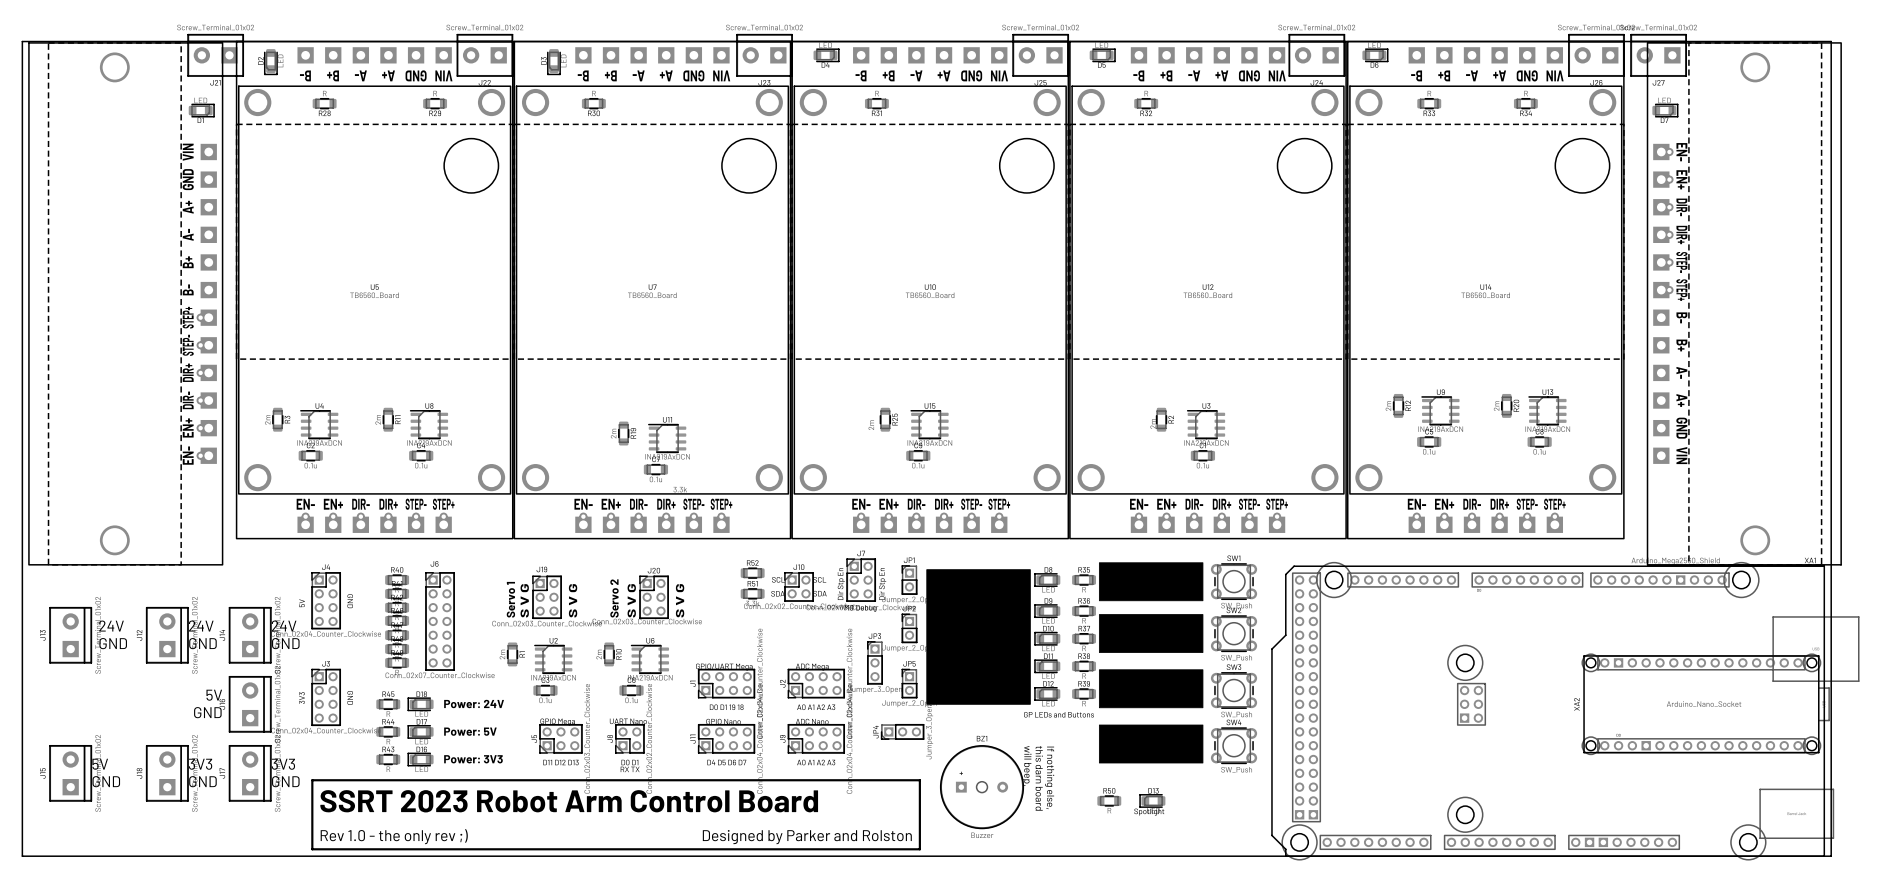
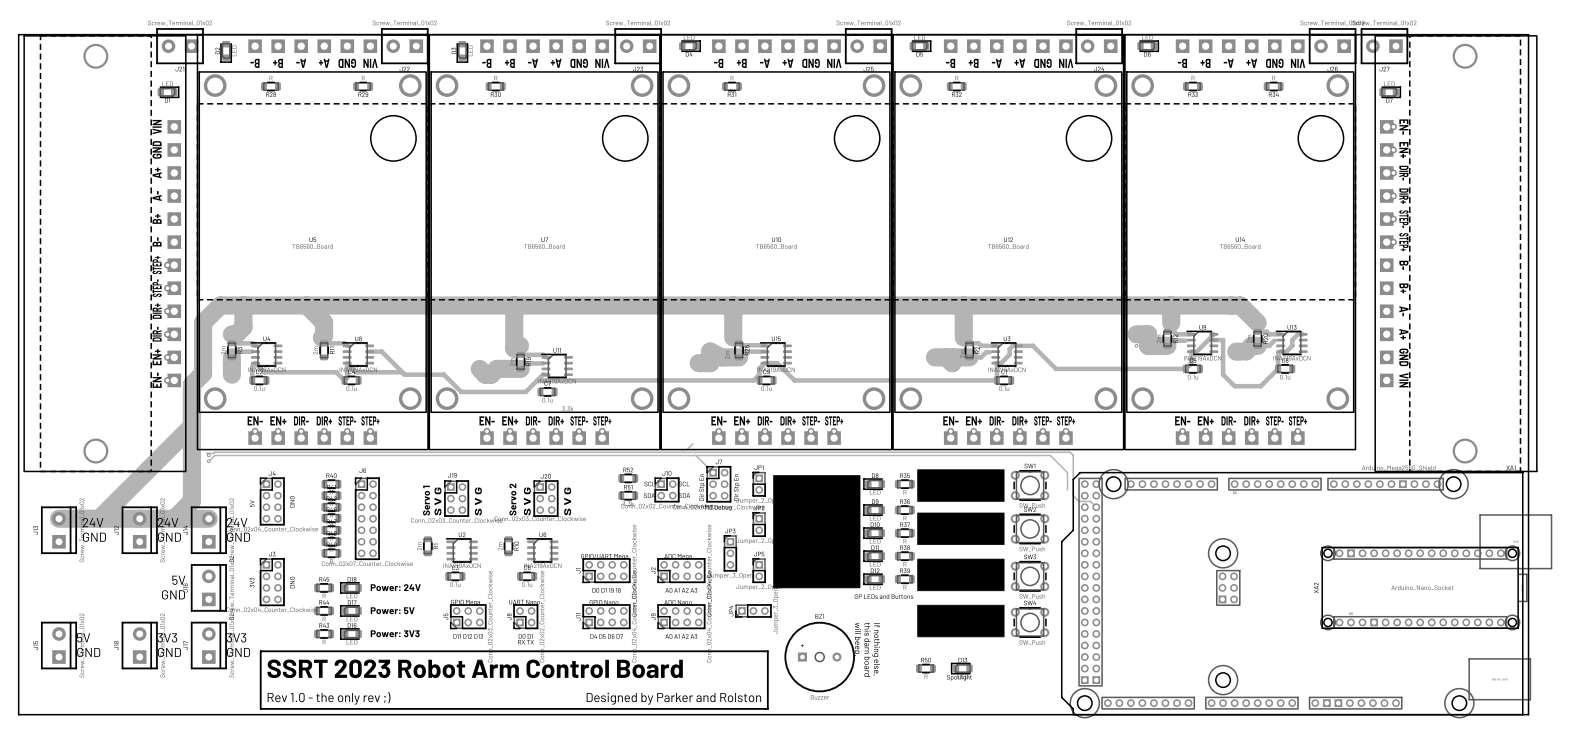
track: none -> (243, 305) (243, 327) (236, 334) (231, 334)
track: none -> (306, 305) (324, 322) (324, 335) (321, 337)
track: none -> (514, 305) (514, 348) (520, 345)
track: none -> (733, 305) (733, 337)
track: none -> (963, 305) (963, 337)
track: none -> (1171, 305) (1171, 322)
track: none -> (1257, 322) (1240, 305) (220, 305) (203, 322) (203, 373) (191, 384) (191, 501) (174, 518)
track: none -> (1167, 331) (1174, 331) (1176, 334) (1191, 334)
track: none -> (1257, 331) (1280, 334)
track: none -> (1136, 334) (1148, 334) (1148, 345) (1167, 345) (1172, 340) (1185, 340)
track: none -> (1213, 334) (1196, 351) (1191, 351) (1191, 363) (1185, 368) (1055, 368) (1032, 345) (1012, 345) (1009, 348) (1009, 354) (1001, 363) (995, 363) (997, 380) (794, 380) (777, 363) (764, 363) (759, 368) (759, 380)
track: none -> (1303, 334) (1298, 334) (1292, 340) (1292, 345) (1286, 351) (1280, 351) (1278, 354) (1278, 368) (1260, 386) (1234, 386) (1223, 374) (1223, 340) (1213, 340)
track: none -> (1274, 340) (1269, 345) (1251, 345) (1246, 351)
track: none -> (231, 343) (252, 343) (255, 345)
track: none -> (324, 343) (344, 343) (347, 345)
track: none -> (739, 343) (740, 345) (764, 345)
track: none -> (969, 343) (995, 345)
via: none -> (1136, 345)
track: none -> (252, 351) (237, 351) (231, 357) (231, 374)
track: none -> (369, 351) (381, 351) (404, 374) (443, 374) (461, 391) (525, 391) (543, 374) (545, 374)
track: none -> (764, 351) (744, 351) (739, 357) (721, 357) (710, 351) (710, 363) (698, 363)
track: none -> (989, 352) (986, 352) (981, 357) (952, 357) (952, 363) (946, 357) (934, 357)
track: none -> (1236, 351) (1240, 351)
track: none -> (520, 354) (543, 354) (545, 357)
track: none -> (543, 363) (526, 363) (520, 368) (496, 368) (491, 374) (485, 374) (479, 368)
track: none -> (402, 372) (356, 372) (347, 363) (347, 377) (344, 380) (336, 372) (264, 372) (255, 363) (252, 366) (252, 380)
track: none -> (759, 374) (753, 380) (537, 380)
track: none -> (191, 426) (99, 518)
track: none -> (692, 443) (687, 449)
track: none -> (208, 455) (206, 453) (214, 452) (1070, 452) (1073, 455) (1073, 495) (1079, 501) (1090, 501) (1096, 507)
via: none -> (208, 455)
track: none -> (695, 455) (713, 472)
track: none -> (208, 461) (214, 455) (1050, 455) (1067, 472) (1067, 489)
via: none -> (208, 461)
track: none -> (59, 518) (208, 518)

